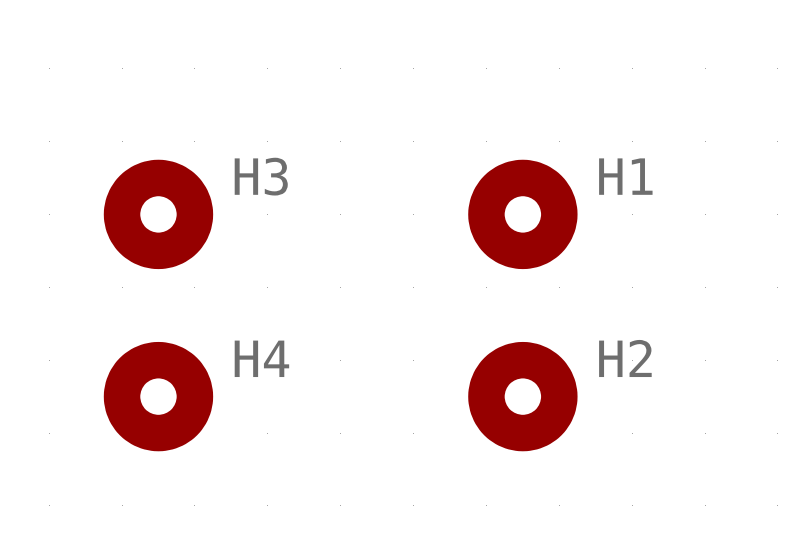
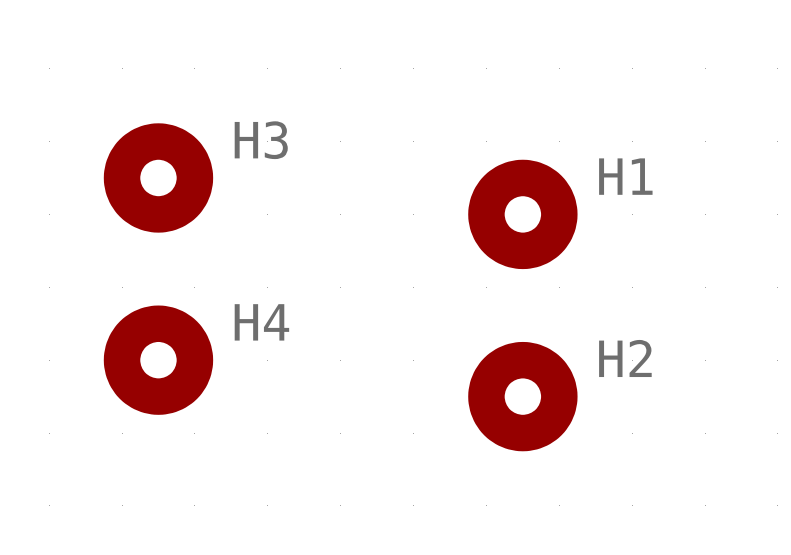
H3 position: (158, 214) -> (158, 177)
H4 position: (158, 396) -> (158, 360)

